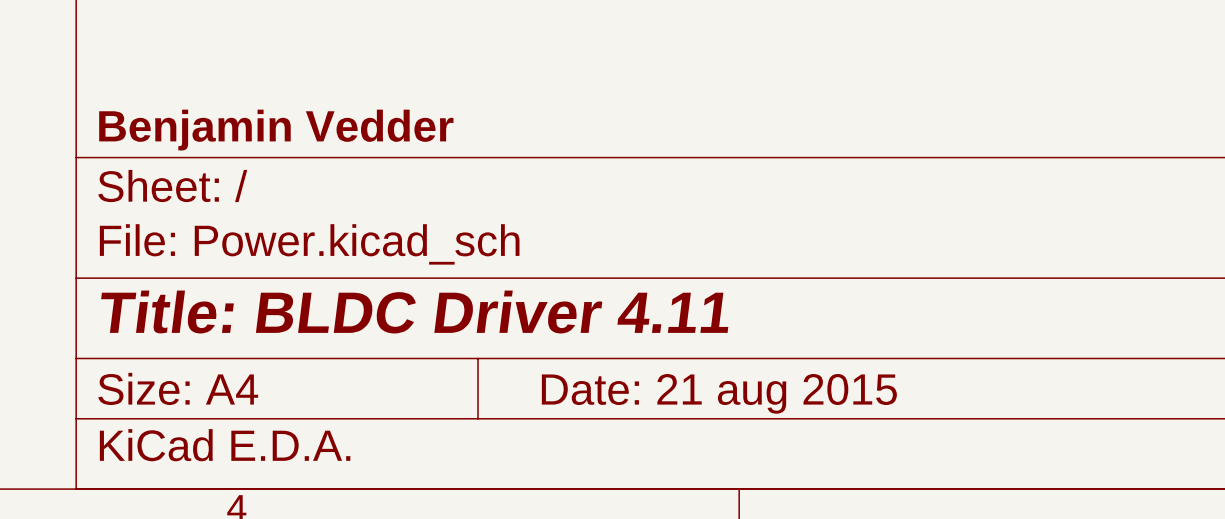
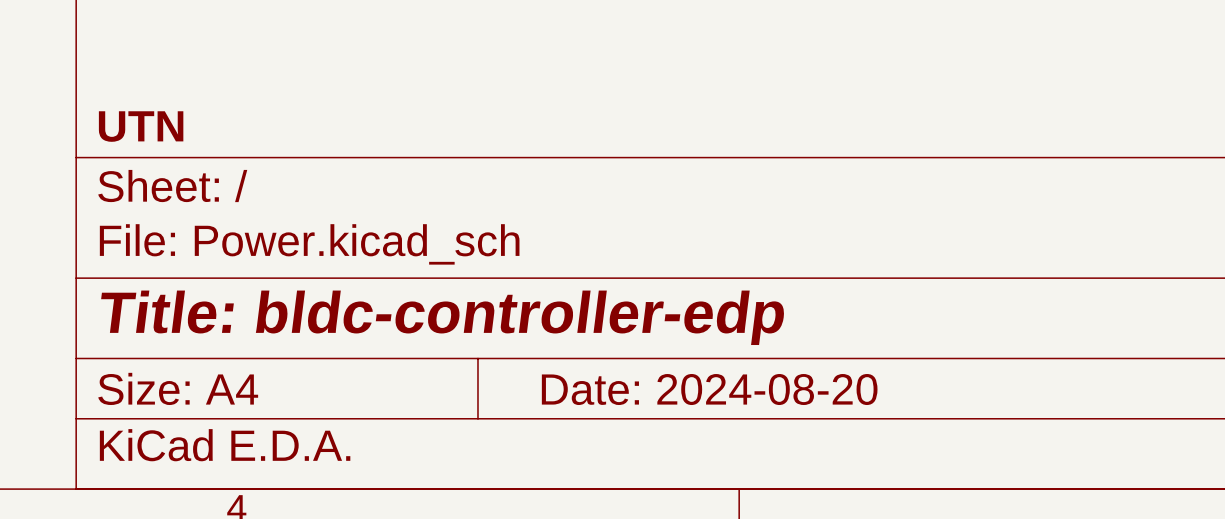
title block: Benjamin Vedder (276, 130) -> UTN (141, 126)
title block: Title: BLDC Driver 4.11 (414, 312) -> Title: bldc-controller-edp (442, 317)
title block: Date: 21 aug 2015 (719, 393) -> Date: 2024-08-20 (709, 389)

